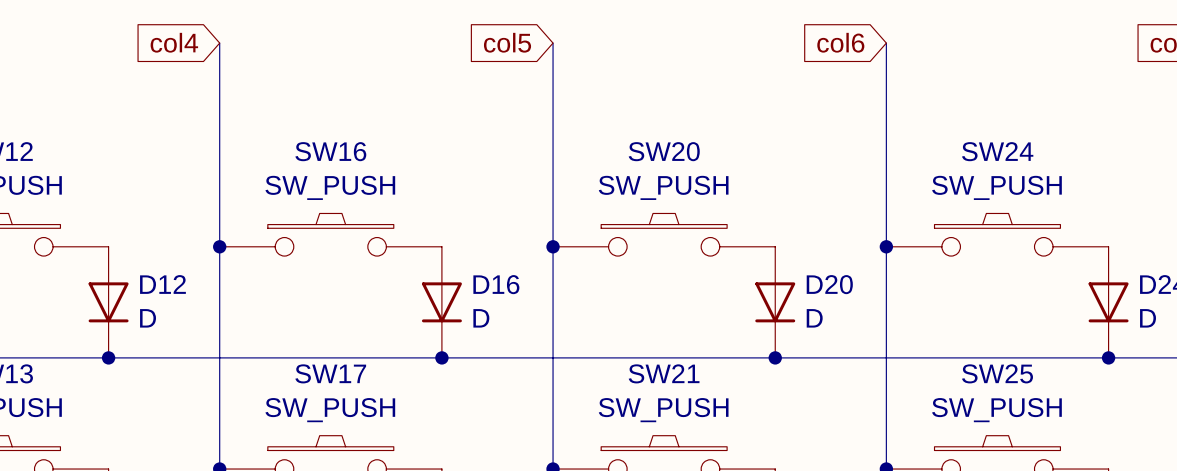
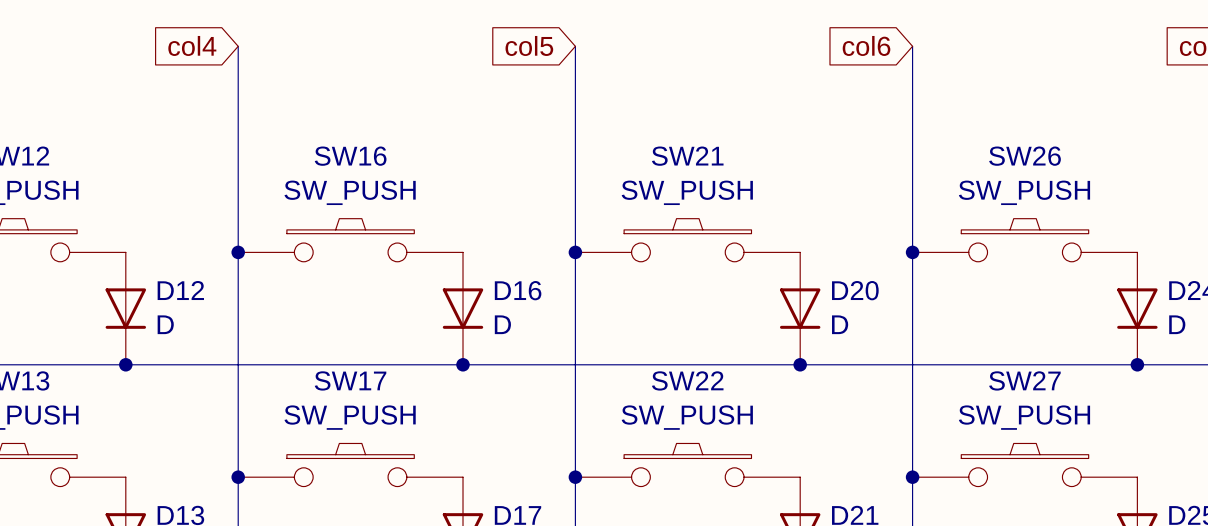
SW20 name: SW20 (664, 151) -> SW21 (687, 156)
SW24 name: SW24 (997, 151) -> SW26 (1025, 156)
SW21 name: SW21 (664, 373) -> SW22 (687, 380)
SW25 name: SW25 (997, 373) -> SW27 (1024, 380)

